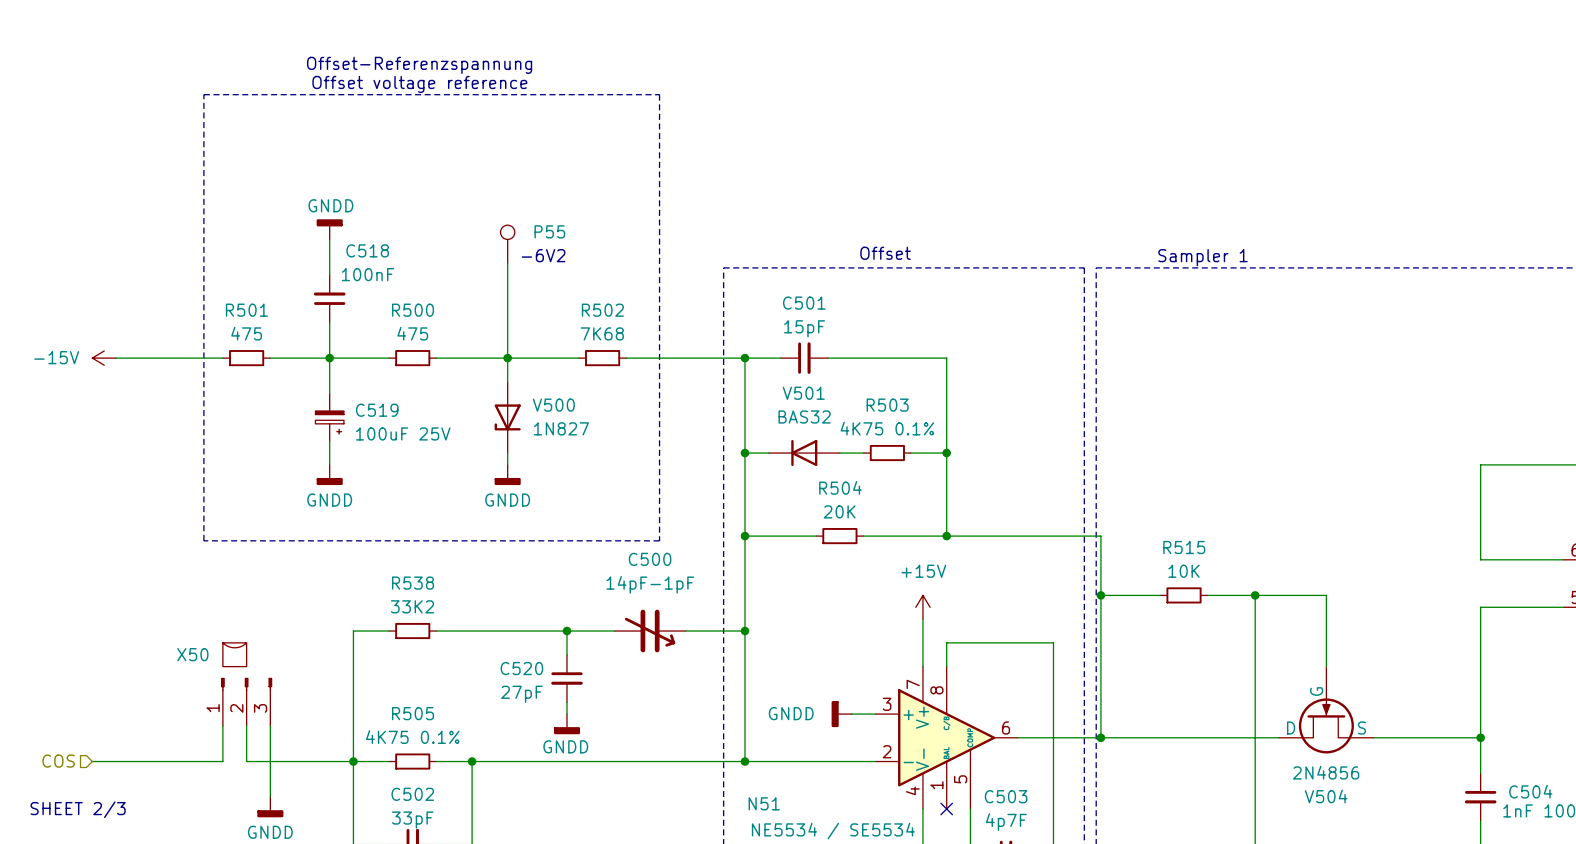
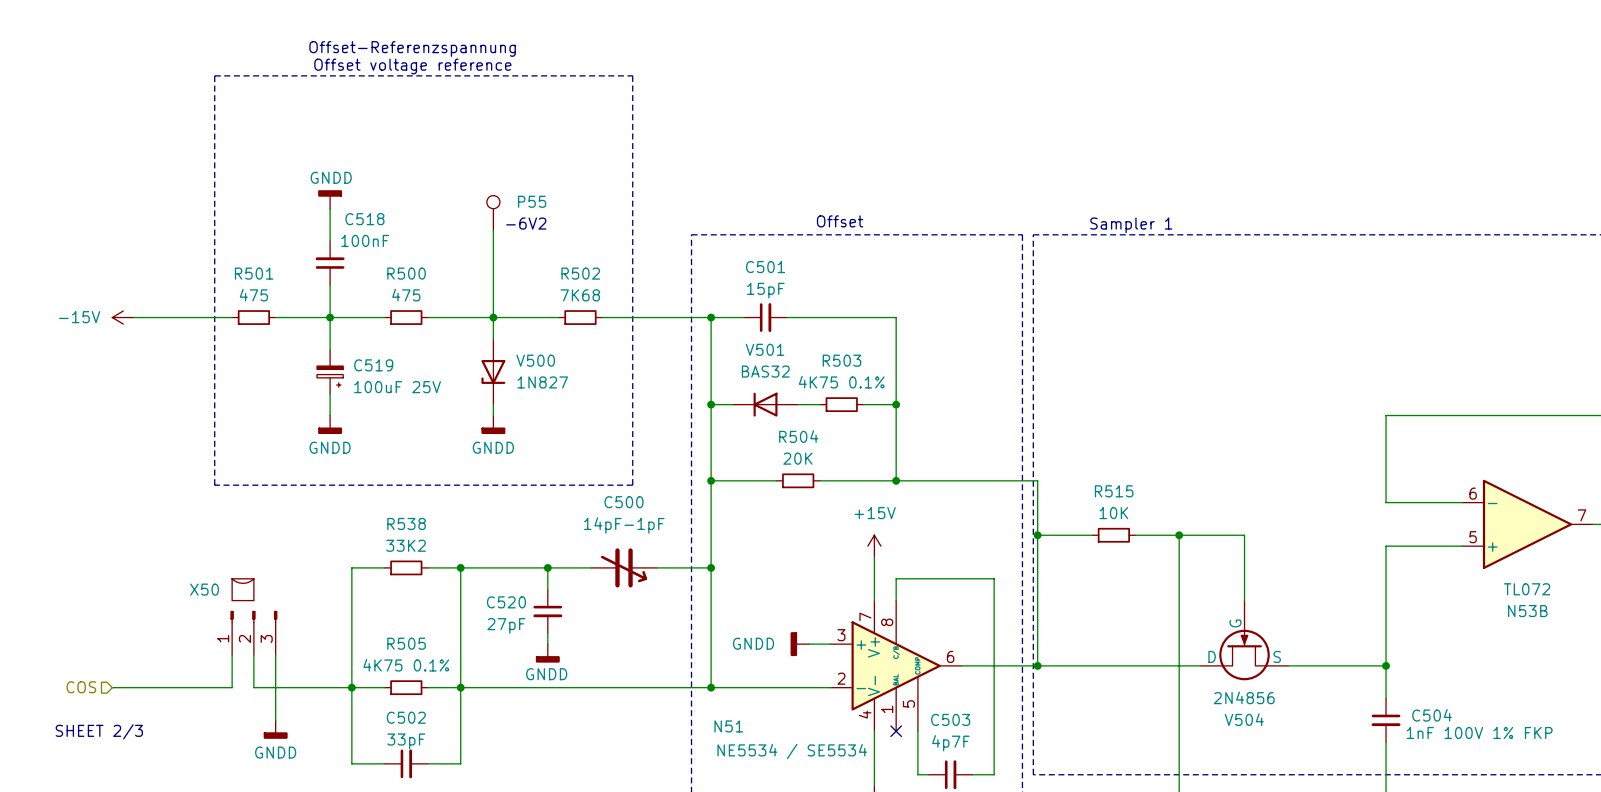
wire: none -> (460, 567) (460, 687)
junction: none -> (460, 567)

